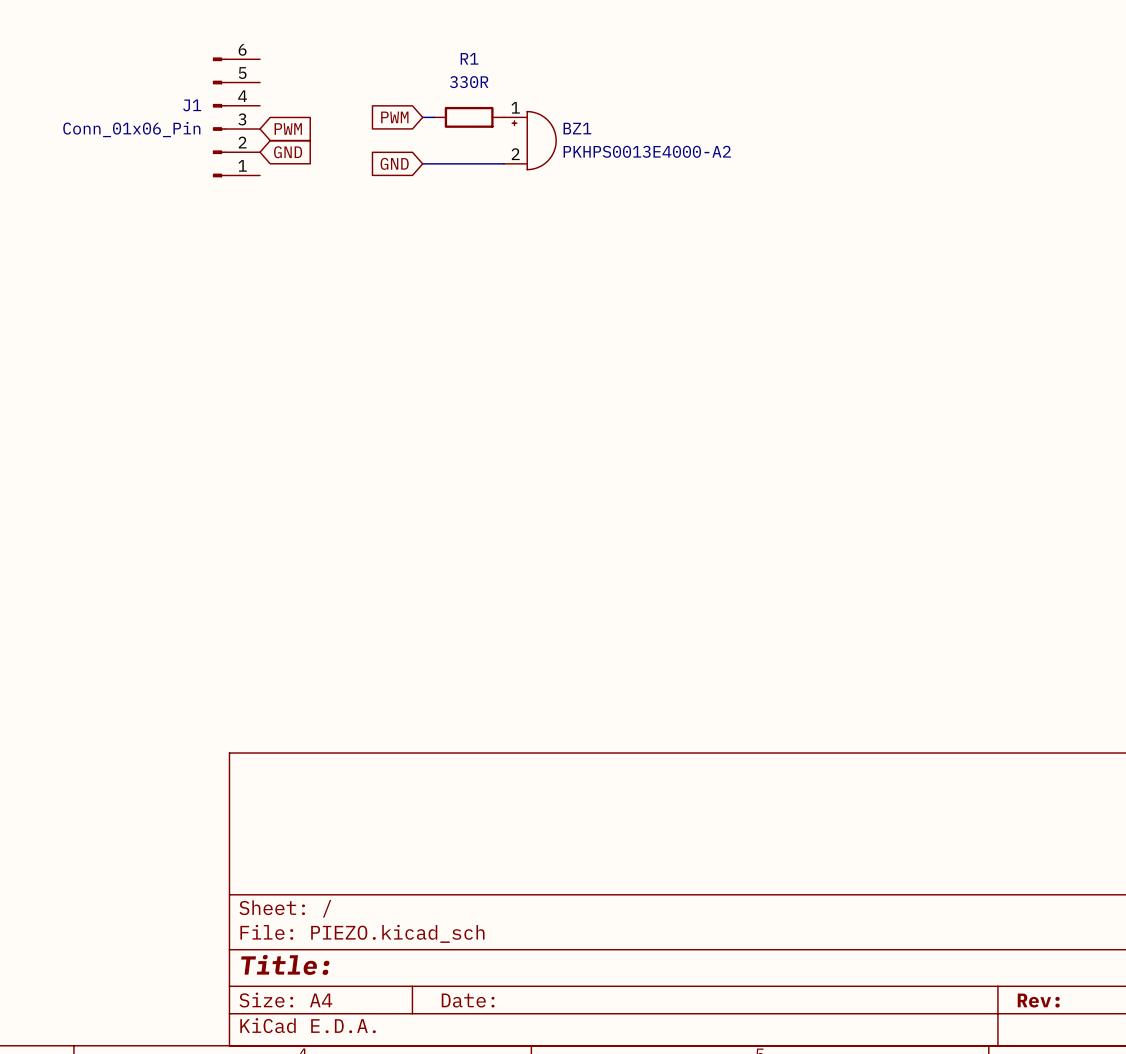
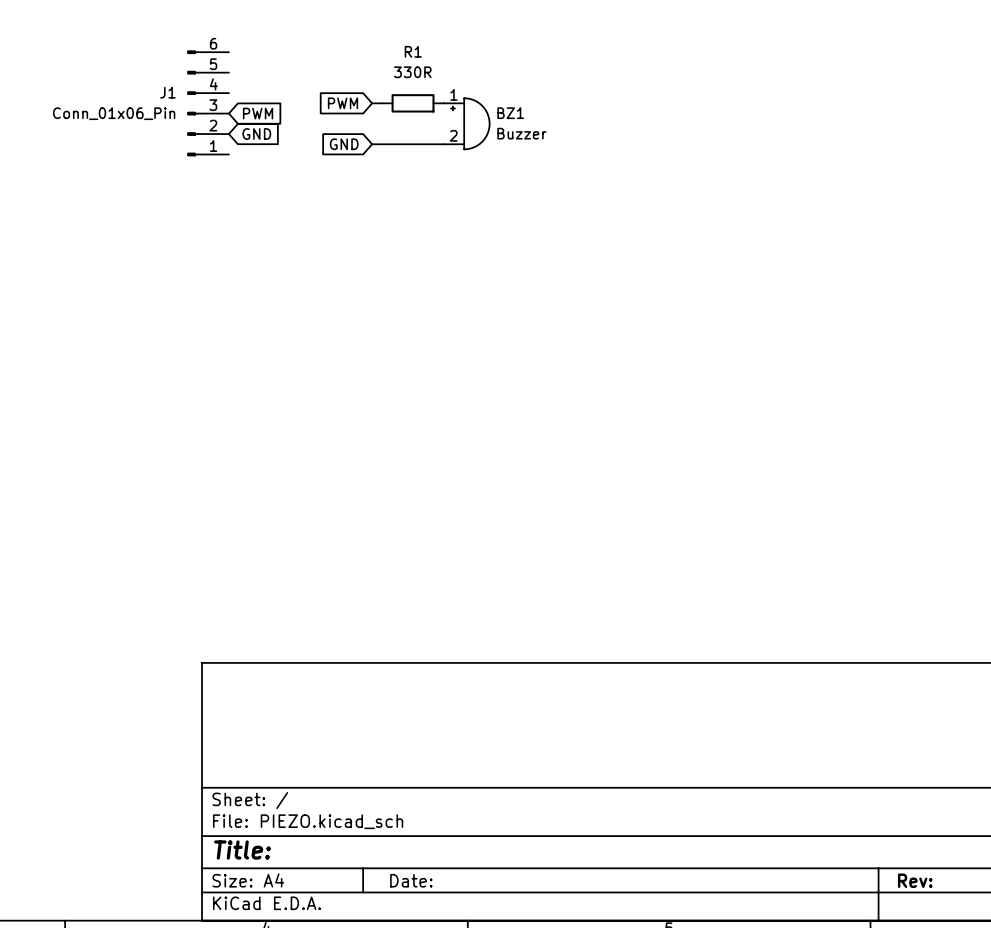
BZ1 value: PKHPS0013E4000-A2 (647, 151) -> Buzzer (521, 133)

